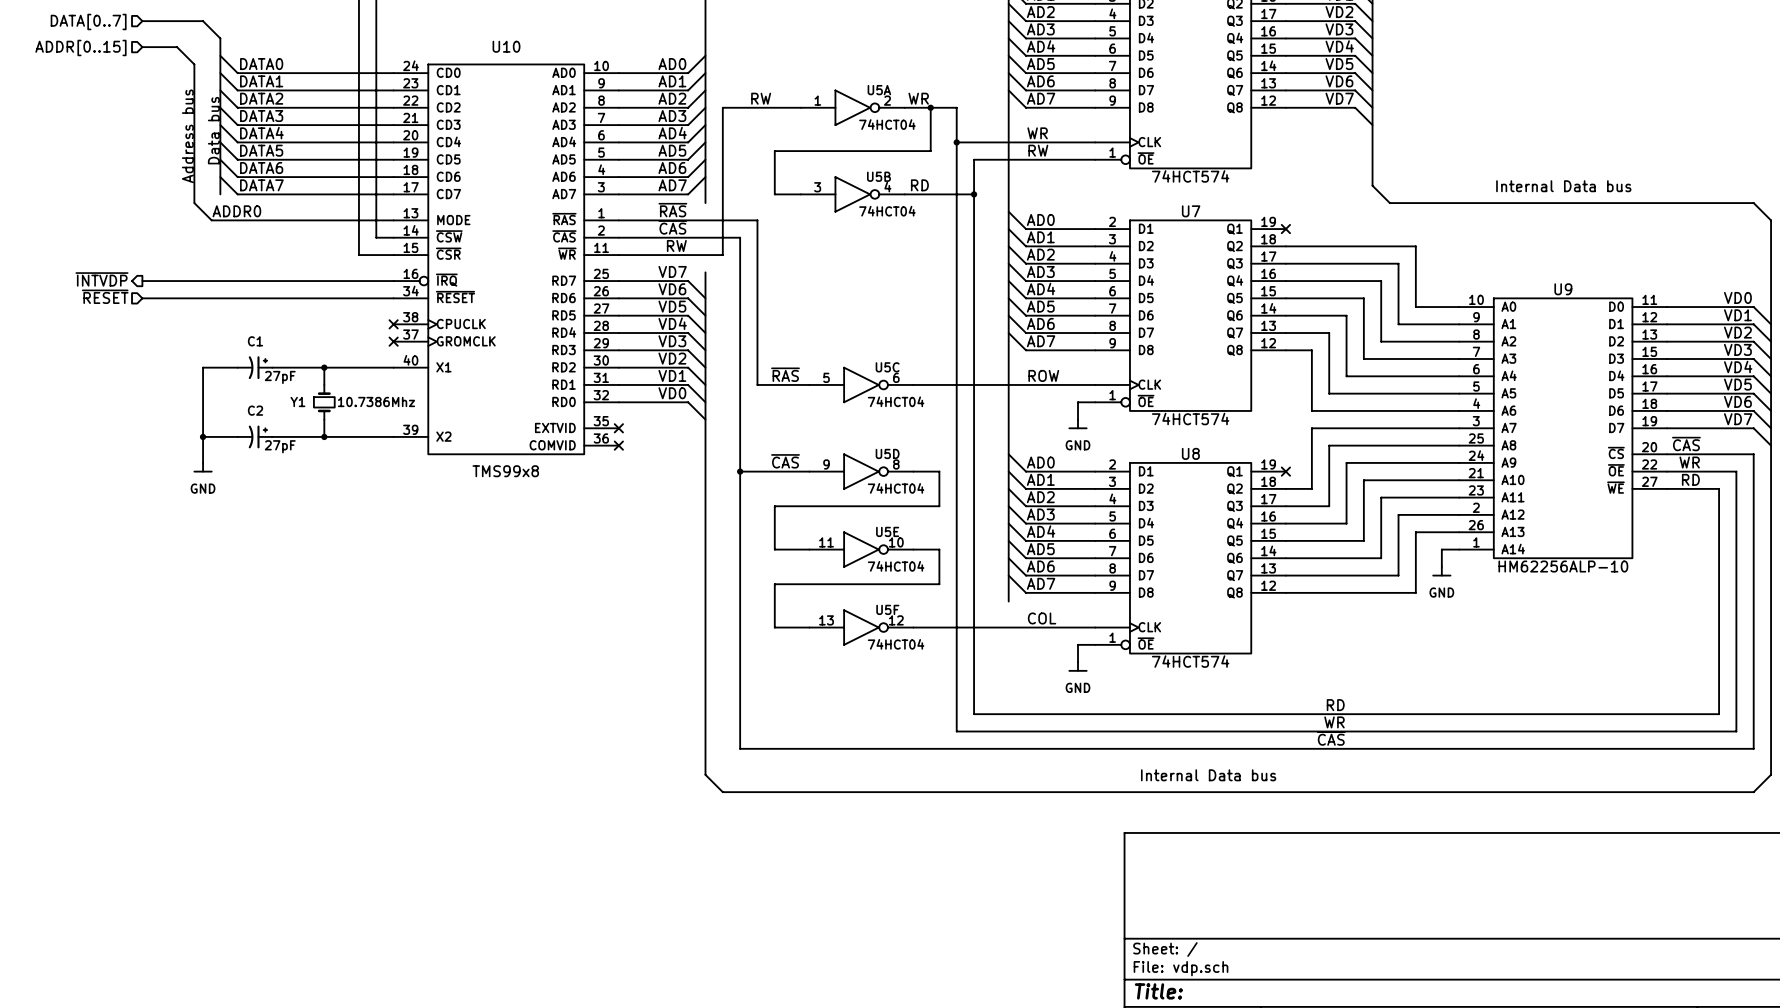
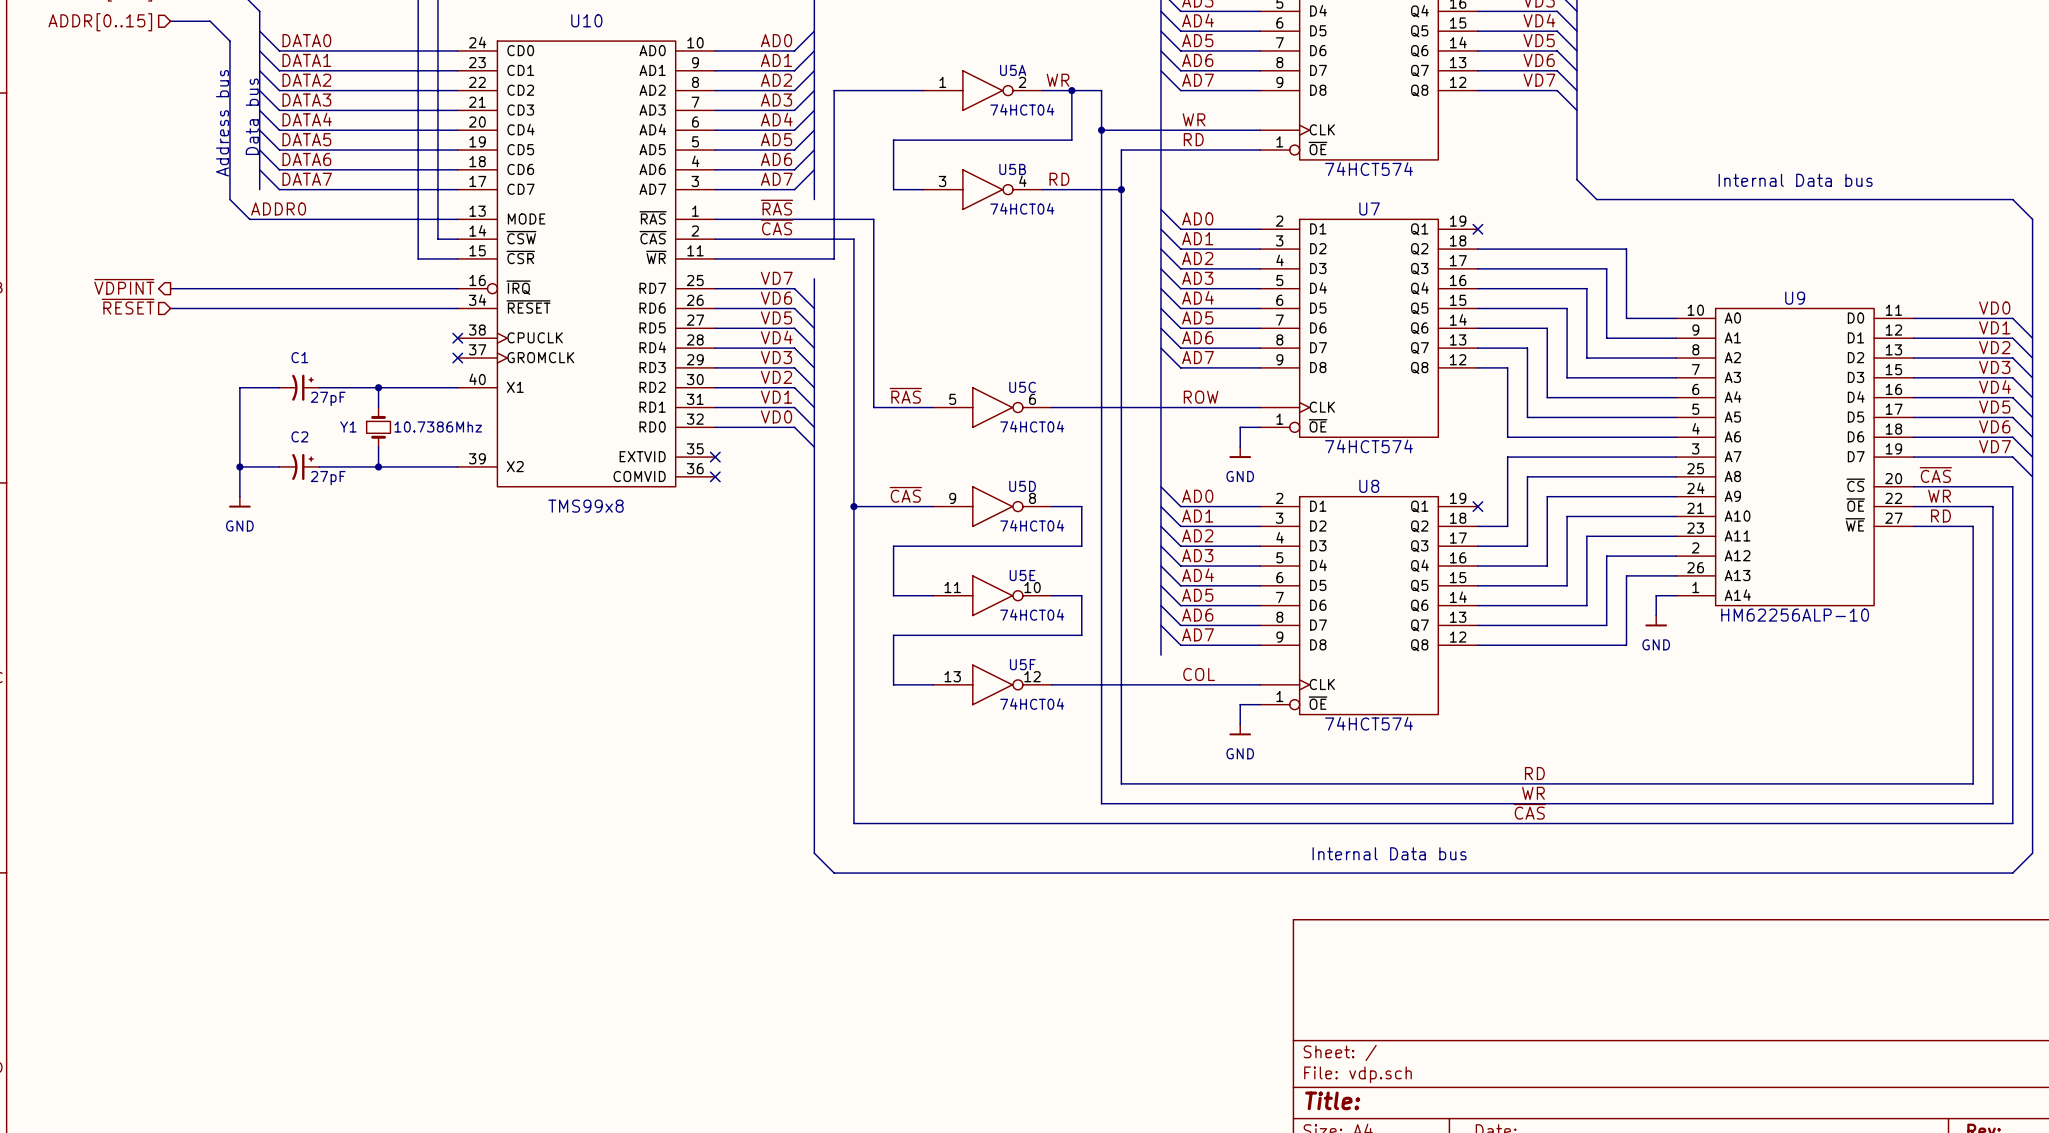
label: RW (761, 98) -> none
label: RW (1038, 150) -> RD (1193, 139)
label: RW (676, 245) -> none
hierarchical label: ~{INTVDP} (101, 279) -> ~{VDPINT} (124, 286)

